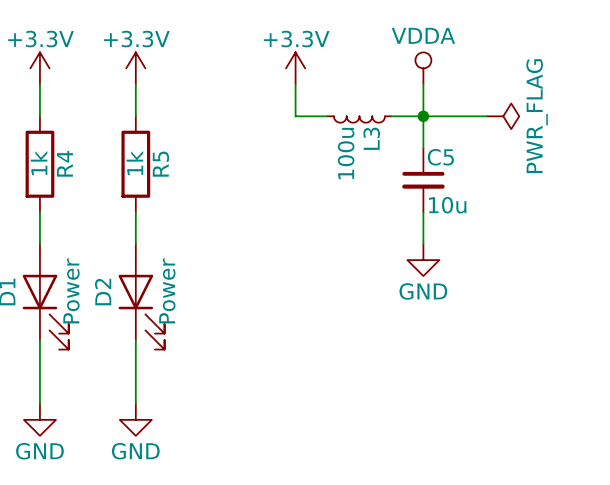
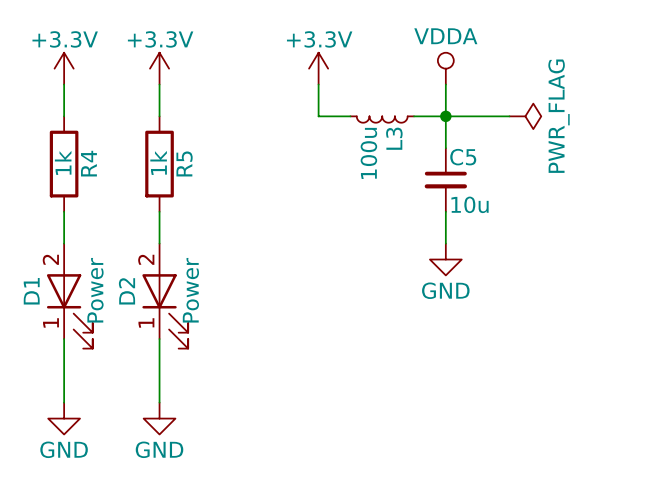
D1 pin number: none -> 2 (50, 259)
D2 pin number: none -> 2 (146, 259)
D1 pin number: none -> 1 (50, 322)
D2 pin number: none -> 1 (146, 322)

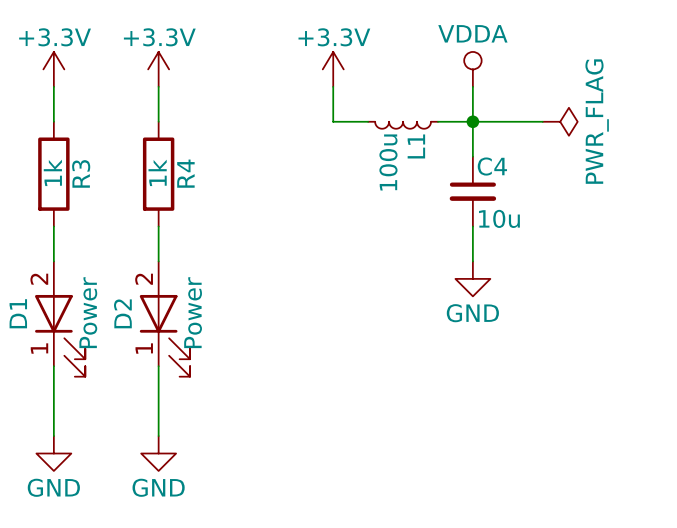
L3 name: L3 (394, 138) -> L1 (416, 146)
C5 name: C5 (463, 157) -> C4 (492, 166)
R4 name: R4 (88, 163) -> R3 (81, 173)
R5 name: R5 (184, 163) -> R4 (185, 173)

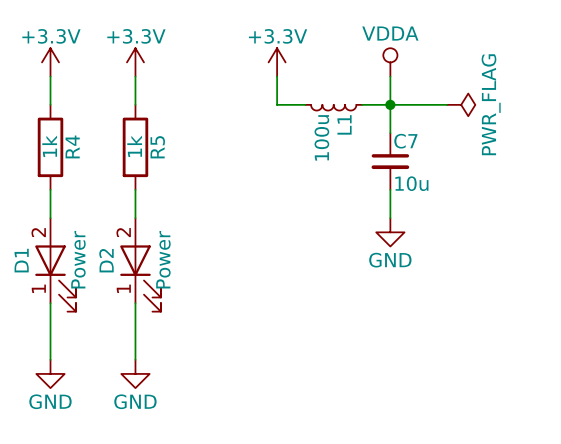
C4 name: C4 (492, 166) -> C7 (405, 141)
R3 name: R3 (81, 173) -> R4 (72, 146)
R4 name: R4 (185, 173) -> R5 (157, 147)

